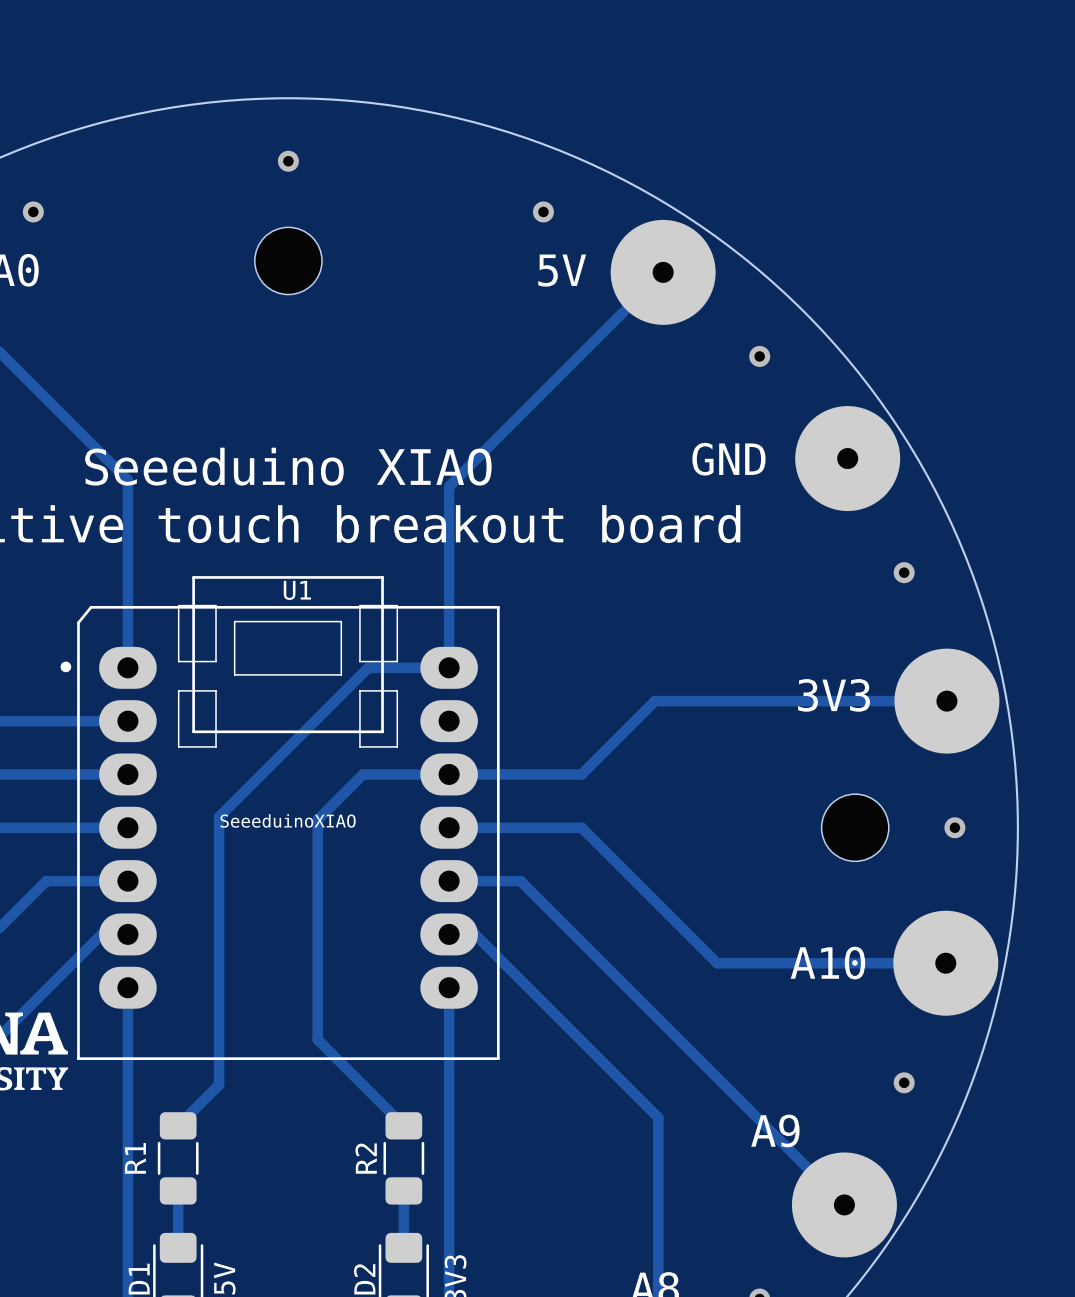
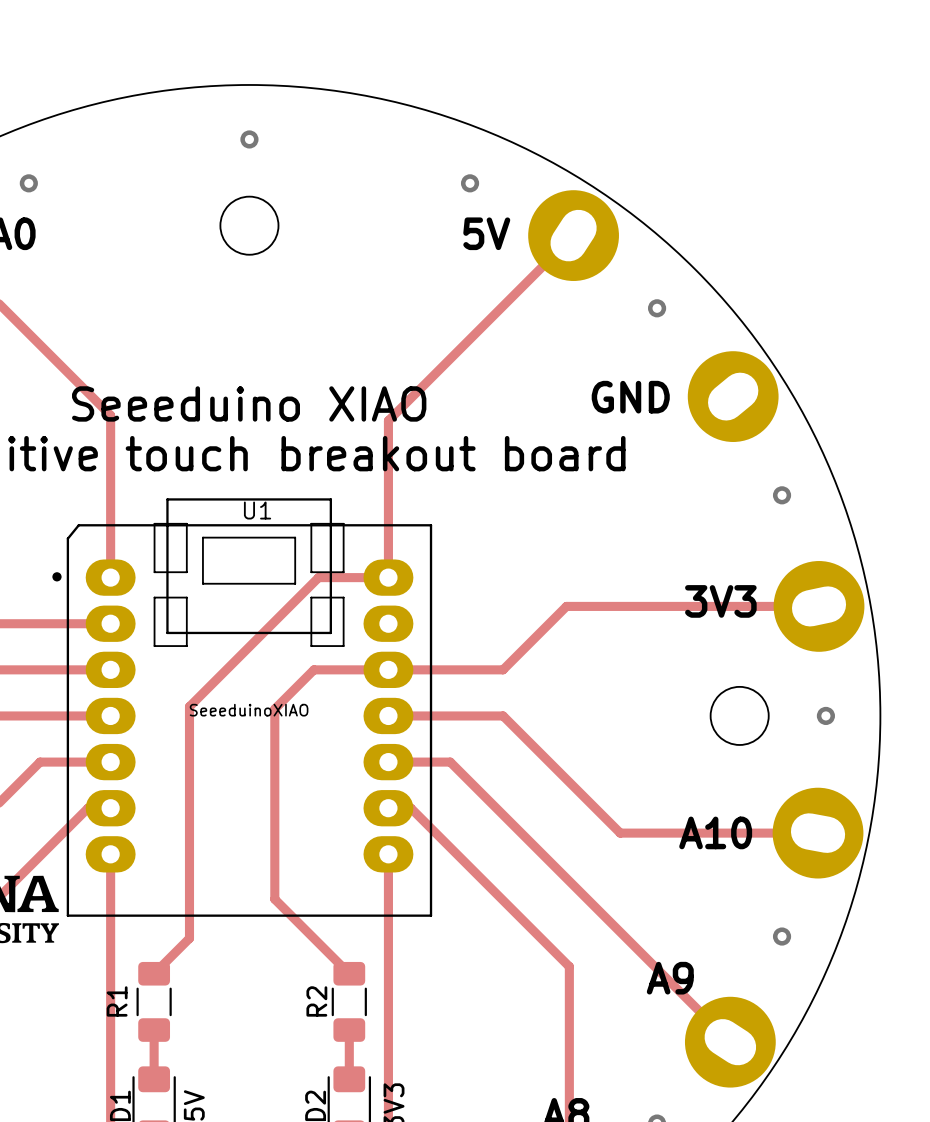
part footprint: [610, 219, 716, 325] -> [528, 190, 619, 281]
part footprint: [795, 406, 901, 512] -> [687, 351, 779, 442]
part footprint: [894, 648, 1000, 754] -> [773, 561, 865, 652]
part footprint: [893, 910, 999, 1016] -> [772, 787, 864, 879]
part footprint: [791, 1152, 897, 1258] -> [684, 996, 776, 1088]

